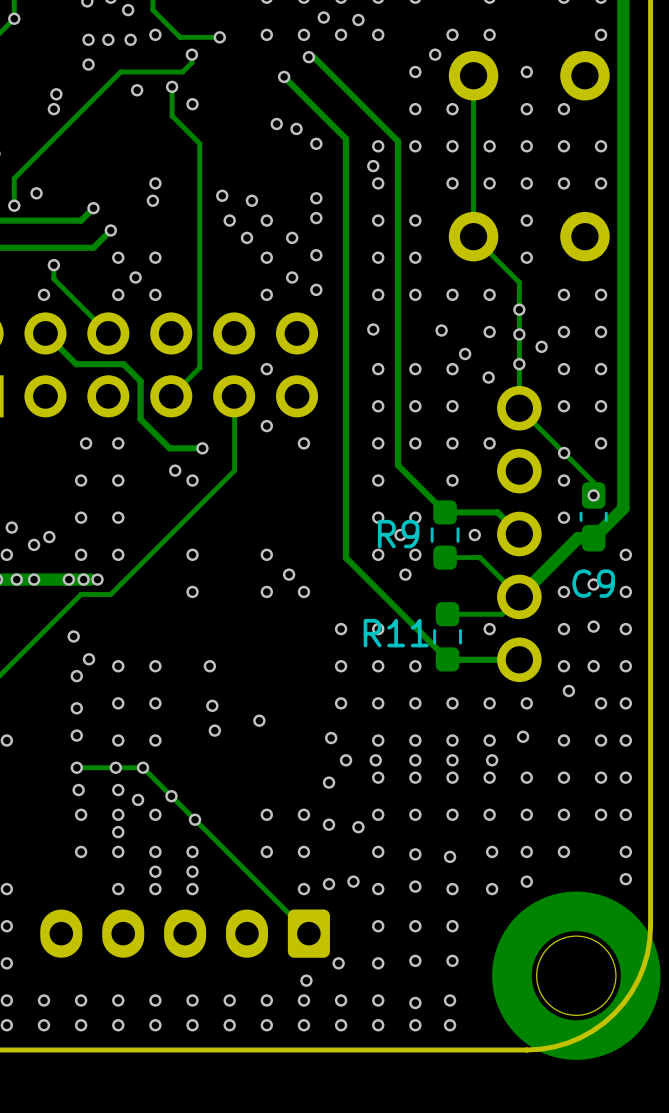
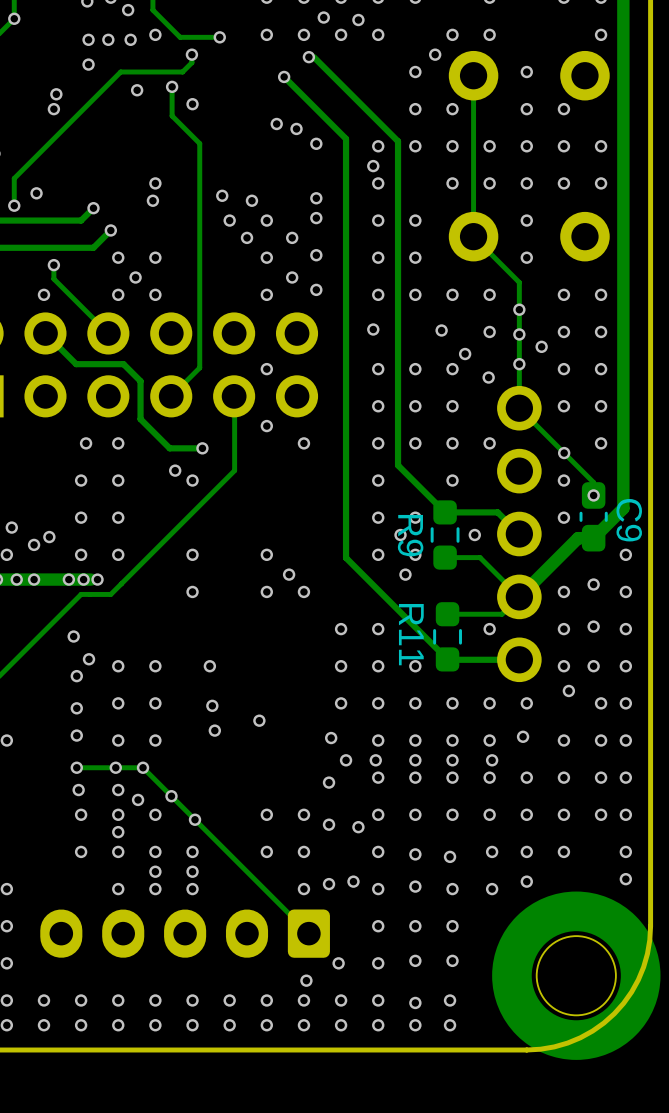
R9 name rotation: 0° (398, 534) -> 90° clockwise (410, 535)
C9 name rotation: 0° (593, 583) -> 90° clockwise (629, 520)
C9 name position: C9 (593, 583) -> C9 (629, 520)
R11 name rotation: 0° (396, 633) -> 90° clockwise (411, 634)

